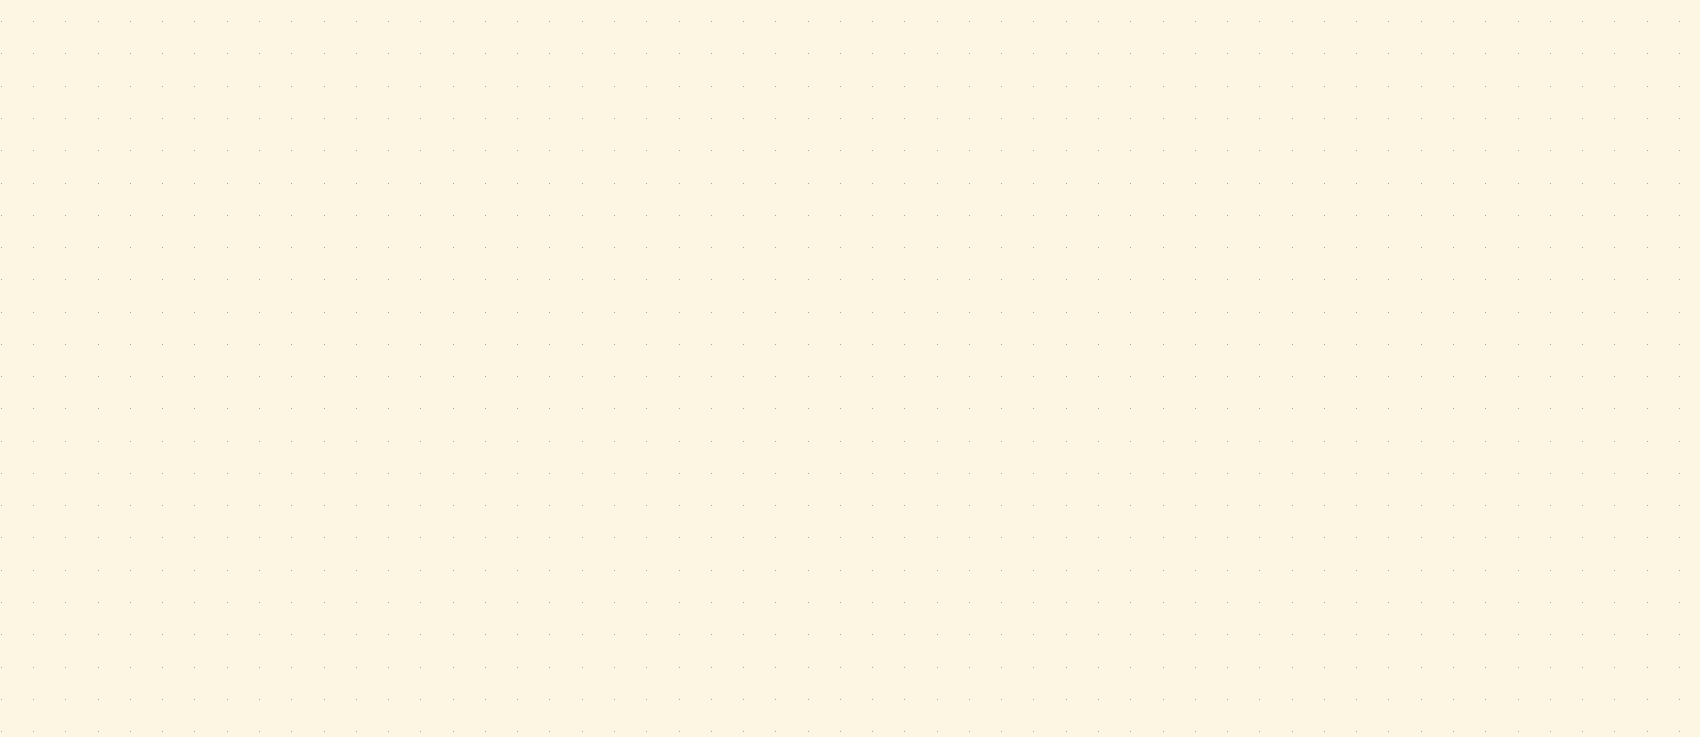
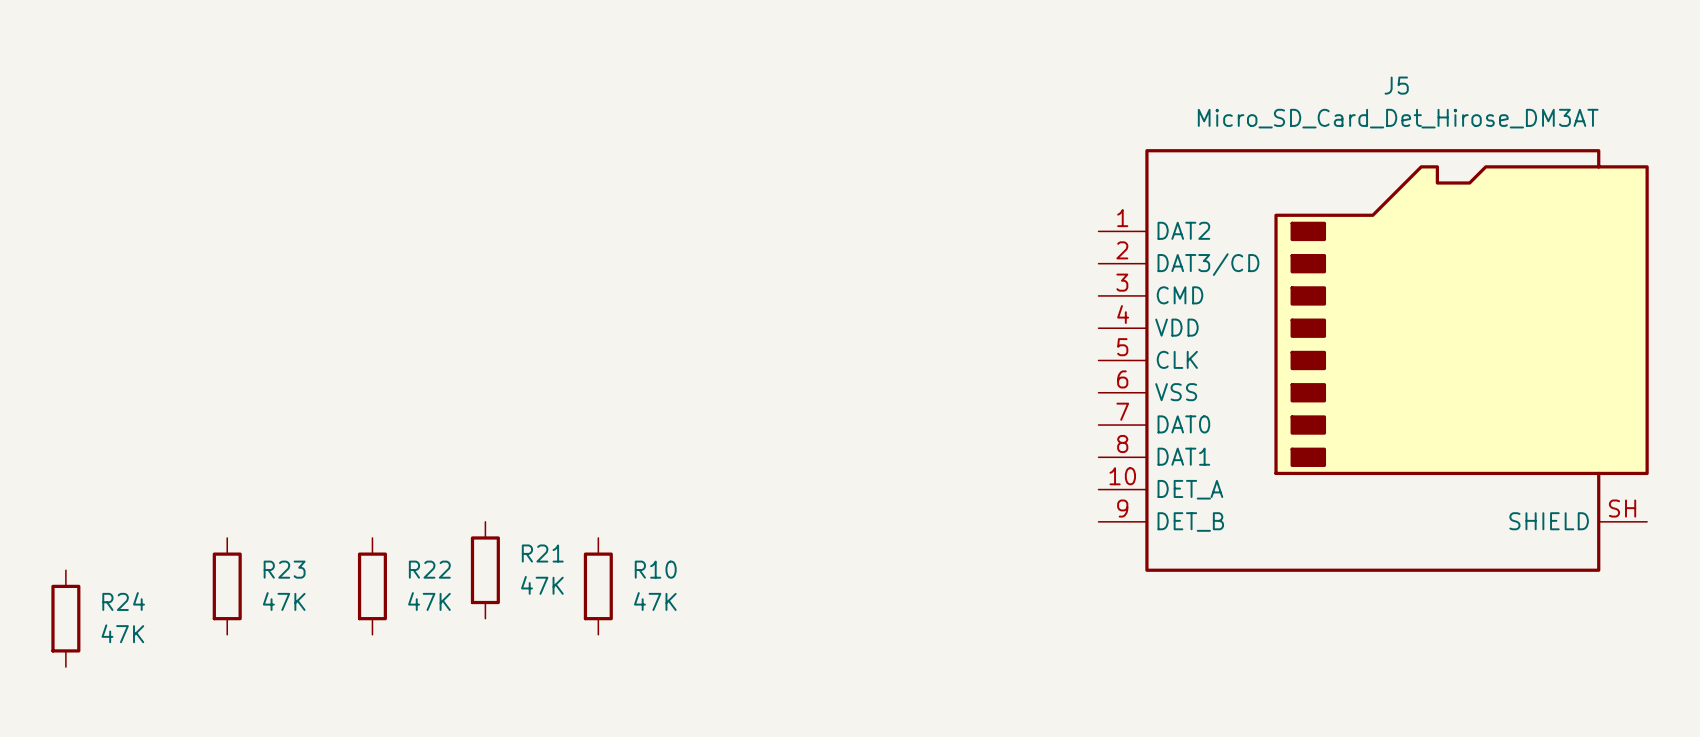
J5: none -> Micro_SD_Card_Det_Hirose_DM3AT (1373, 360)
R21: none -> 47K (485, 570)
R23: none -> 47K (227, 586)
R22: none -> 47K (372, 586)
R10: none -> 47K (598, 586)
R24: none -> 47K (65, 618)

